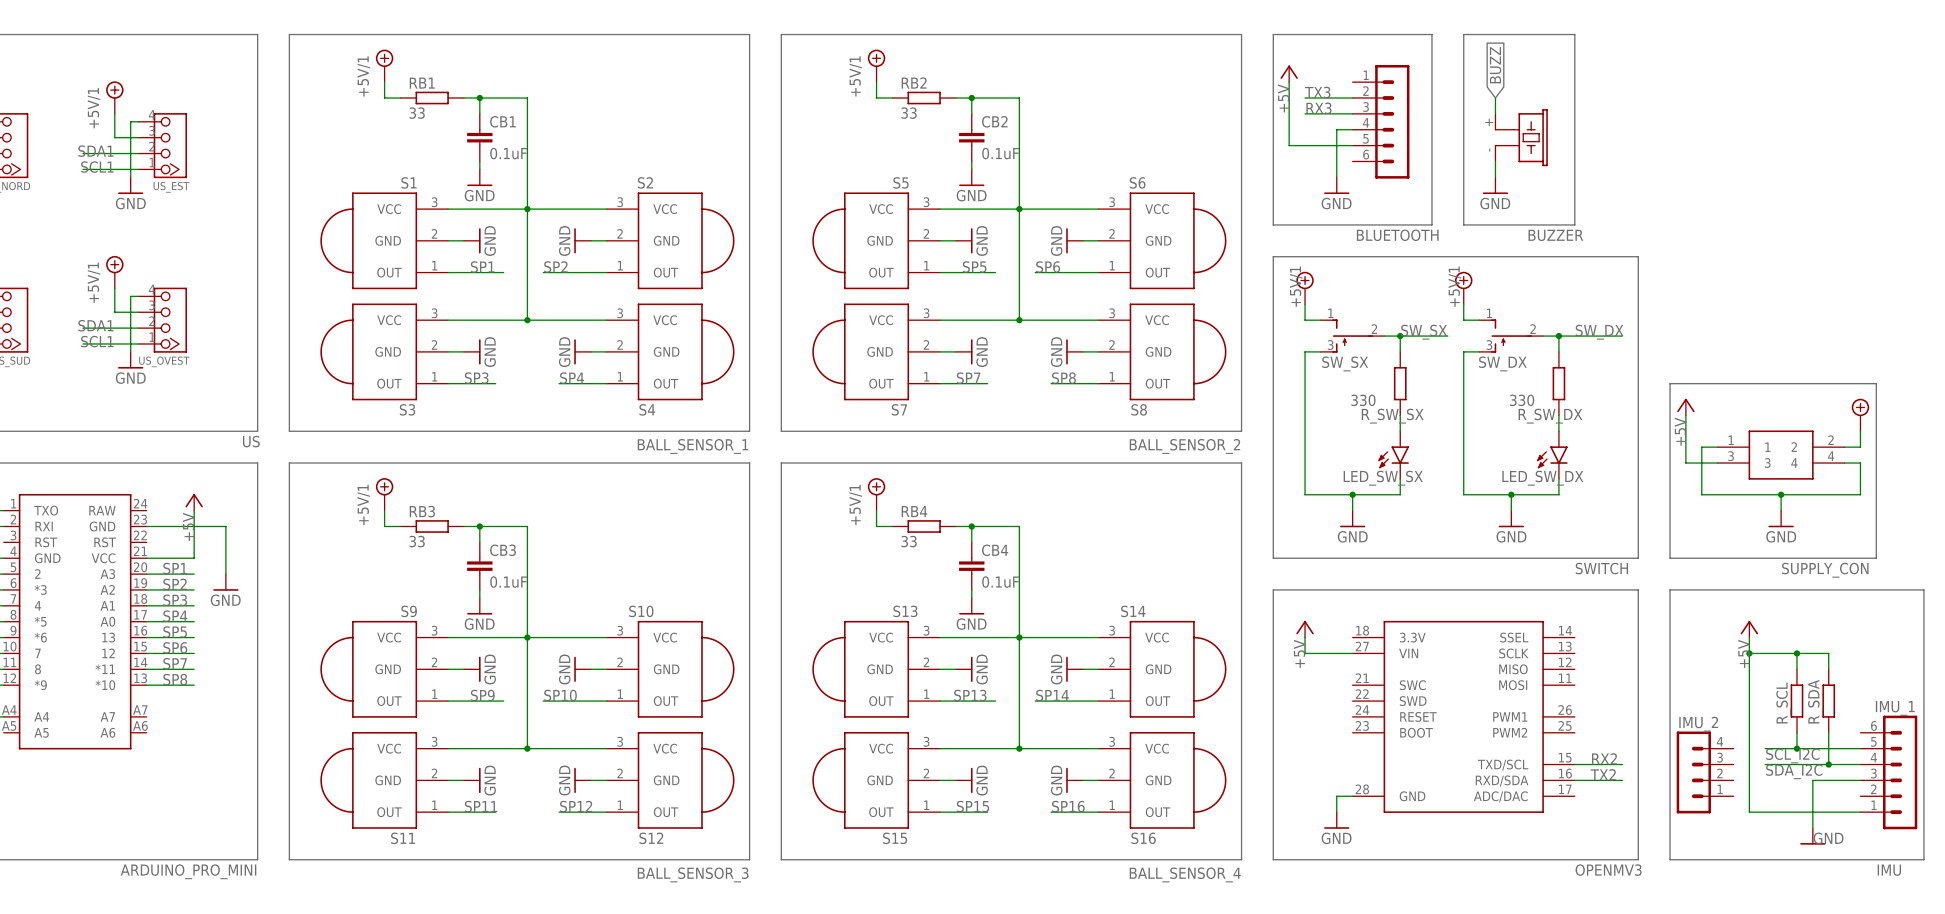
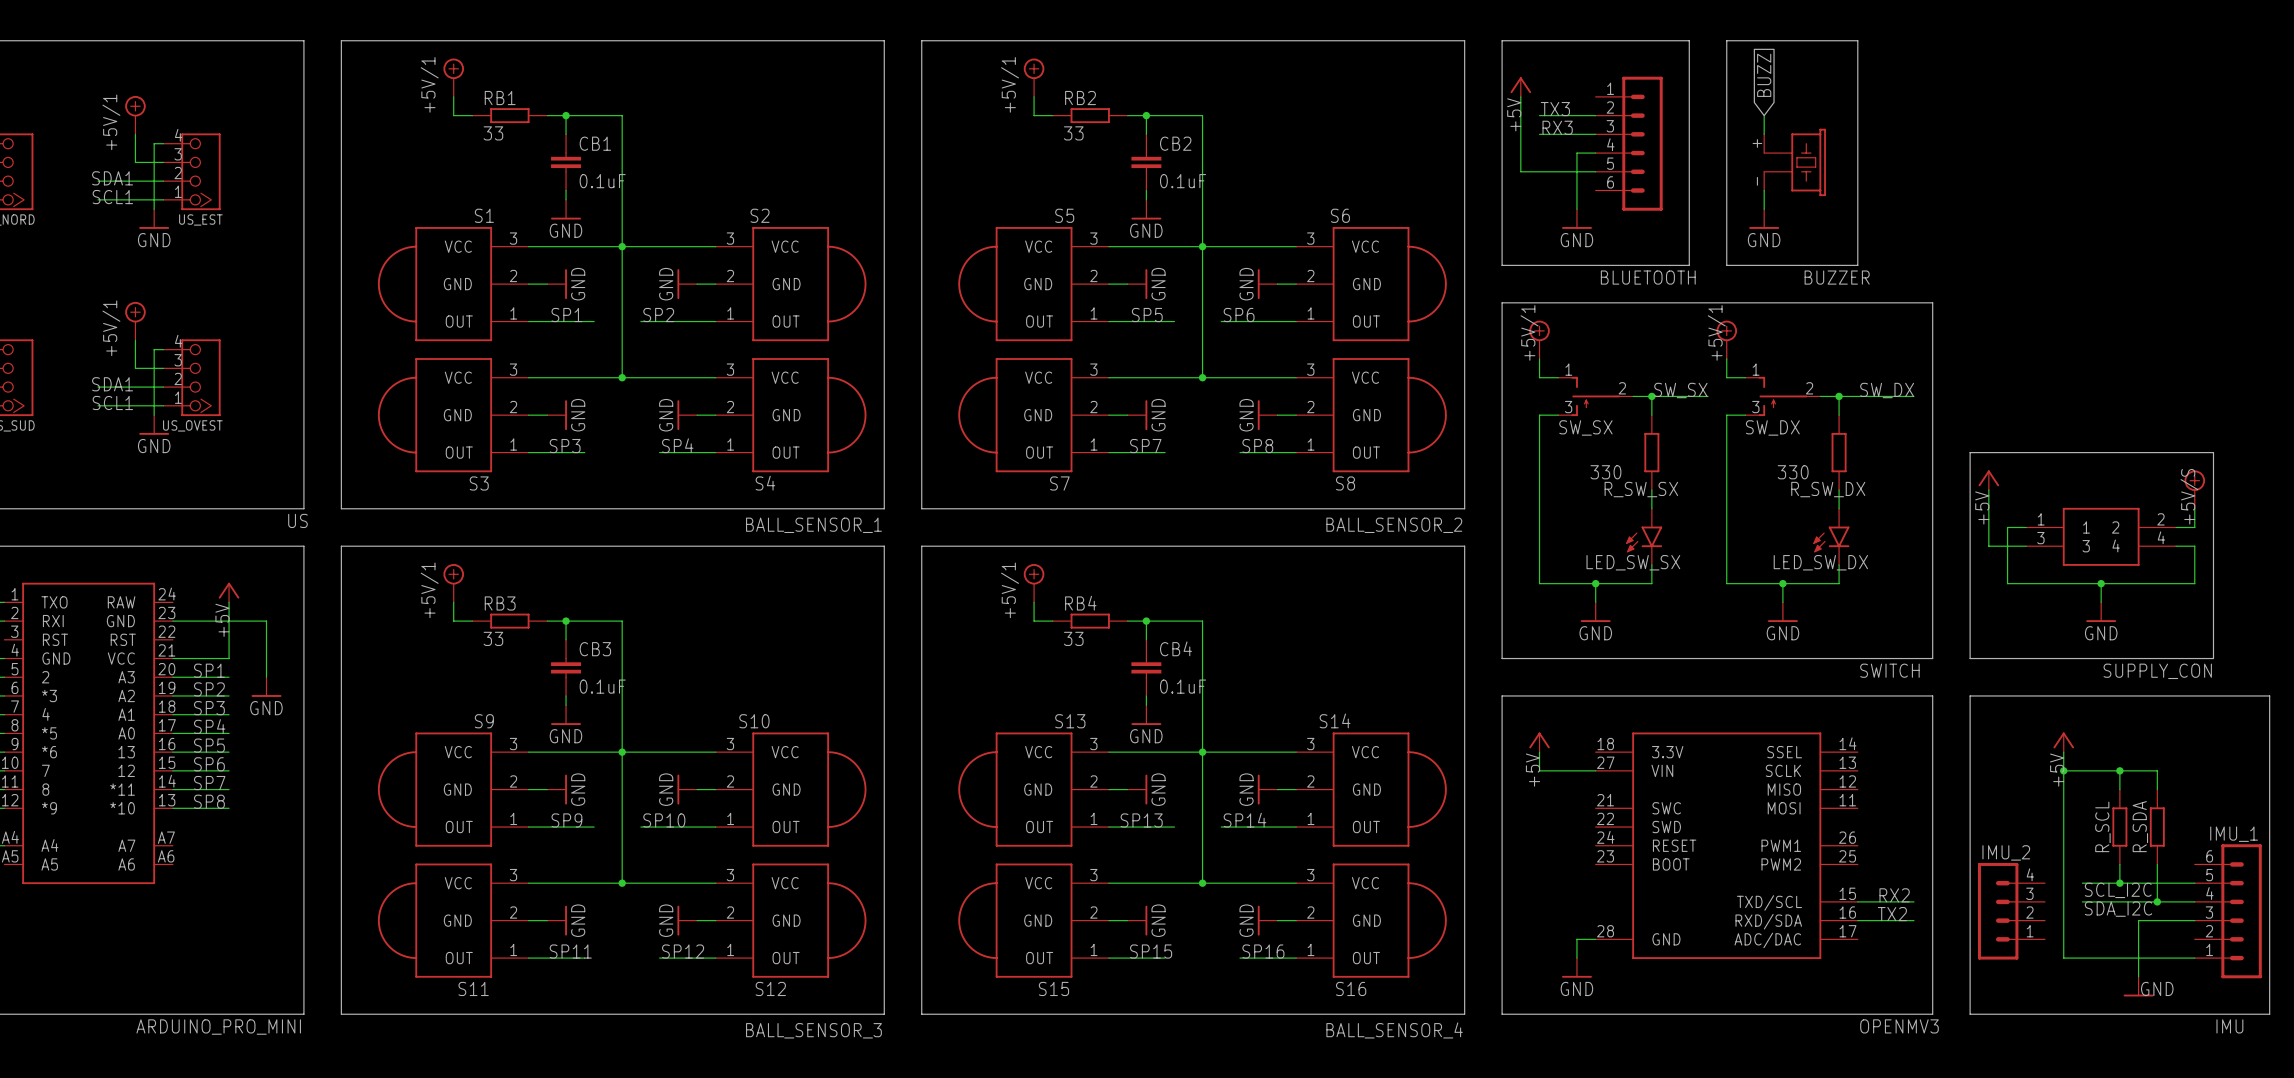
label: none -> +5V/S (2189, 496)

